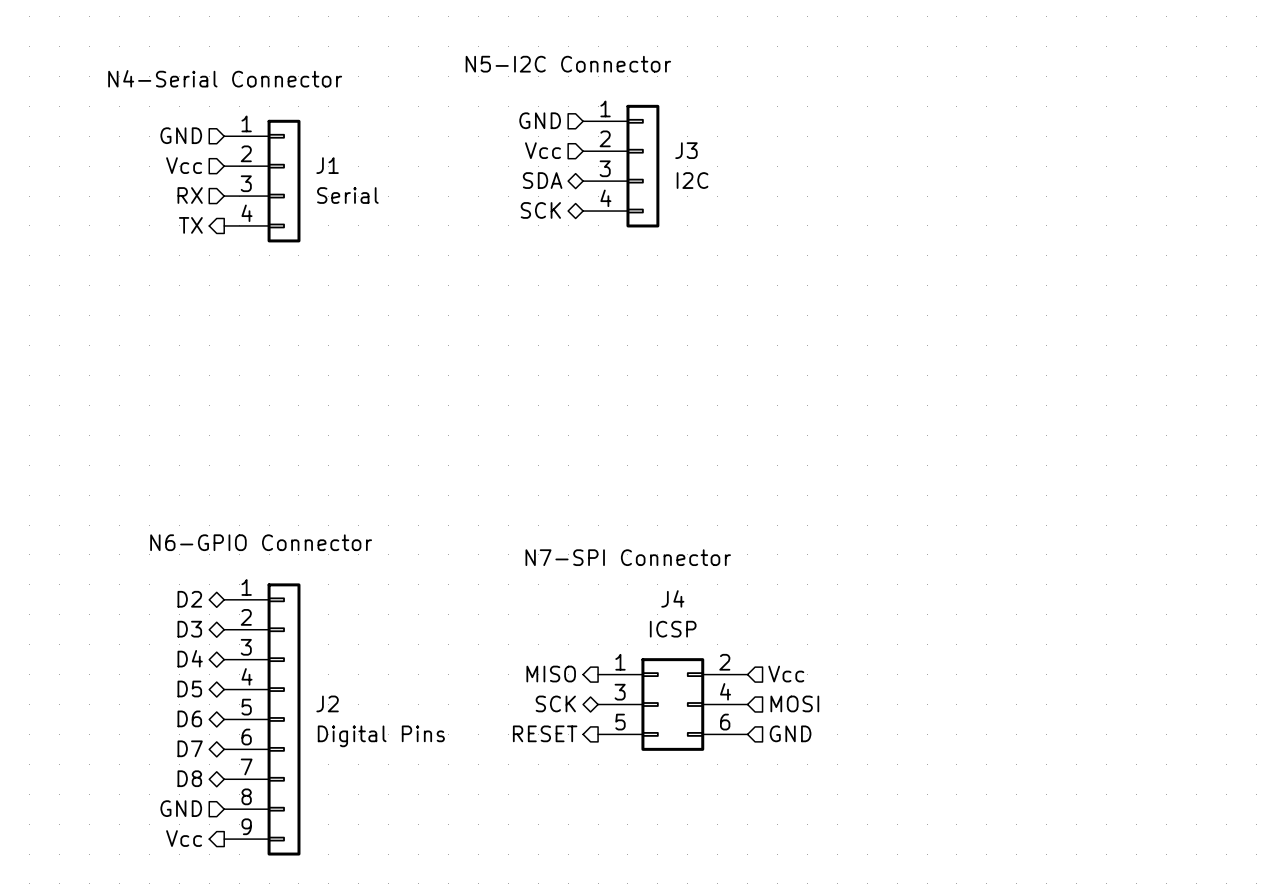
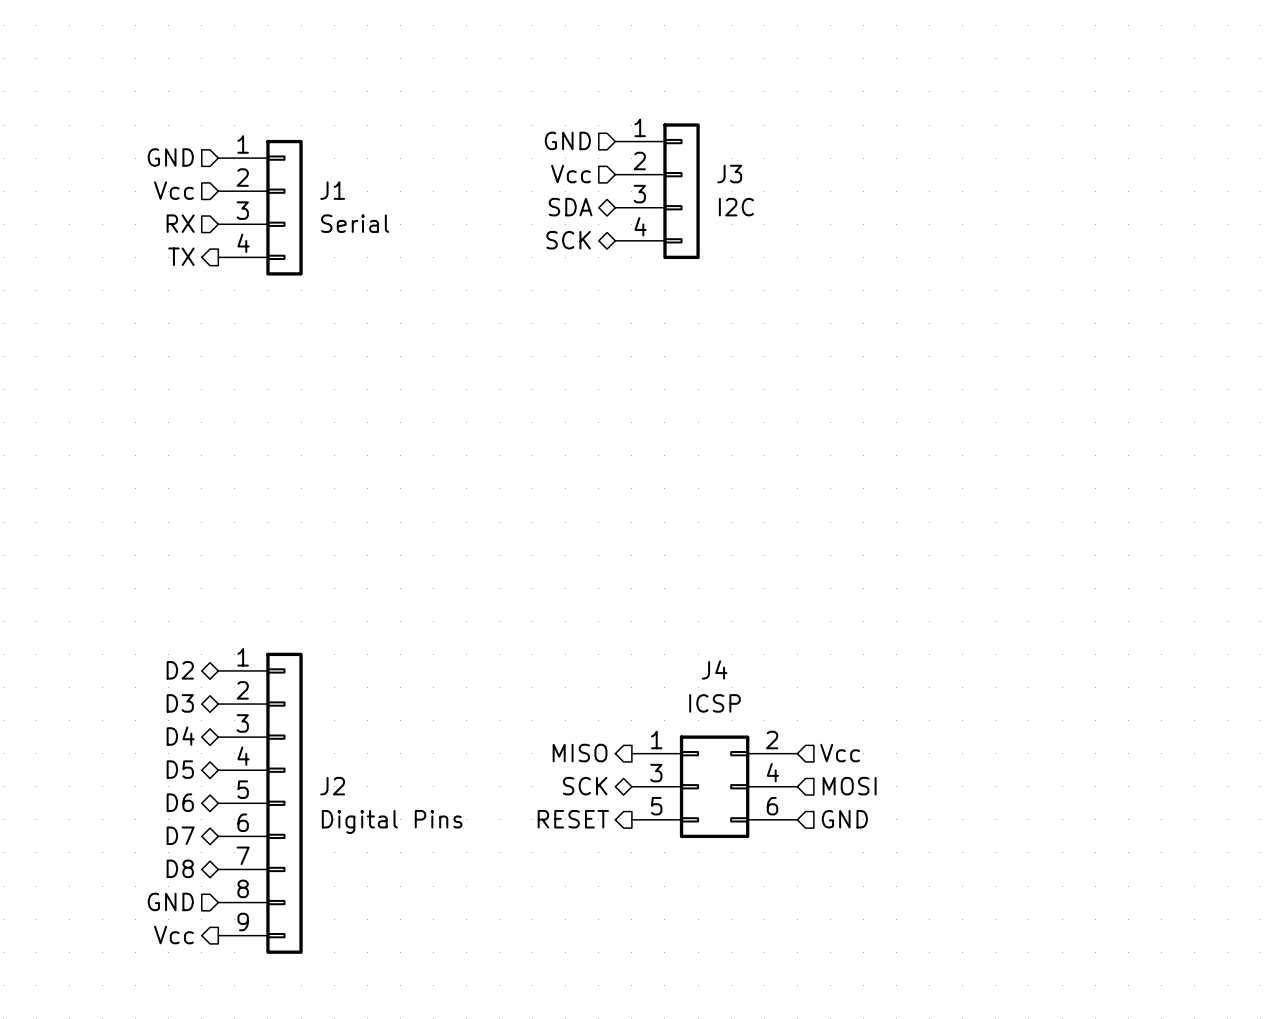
text: N5-I2C Connector (568, 64) -> none
text: N4-Serial Connector (225, 78) -> none
text: N6-GPIO Connector (261, 542) -> none
text: N7-SPI Connector (628, 557) -> none

